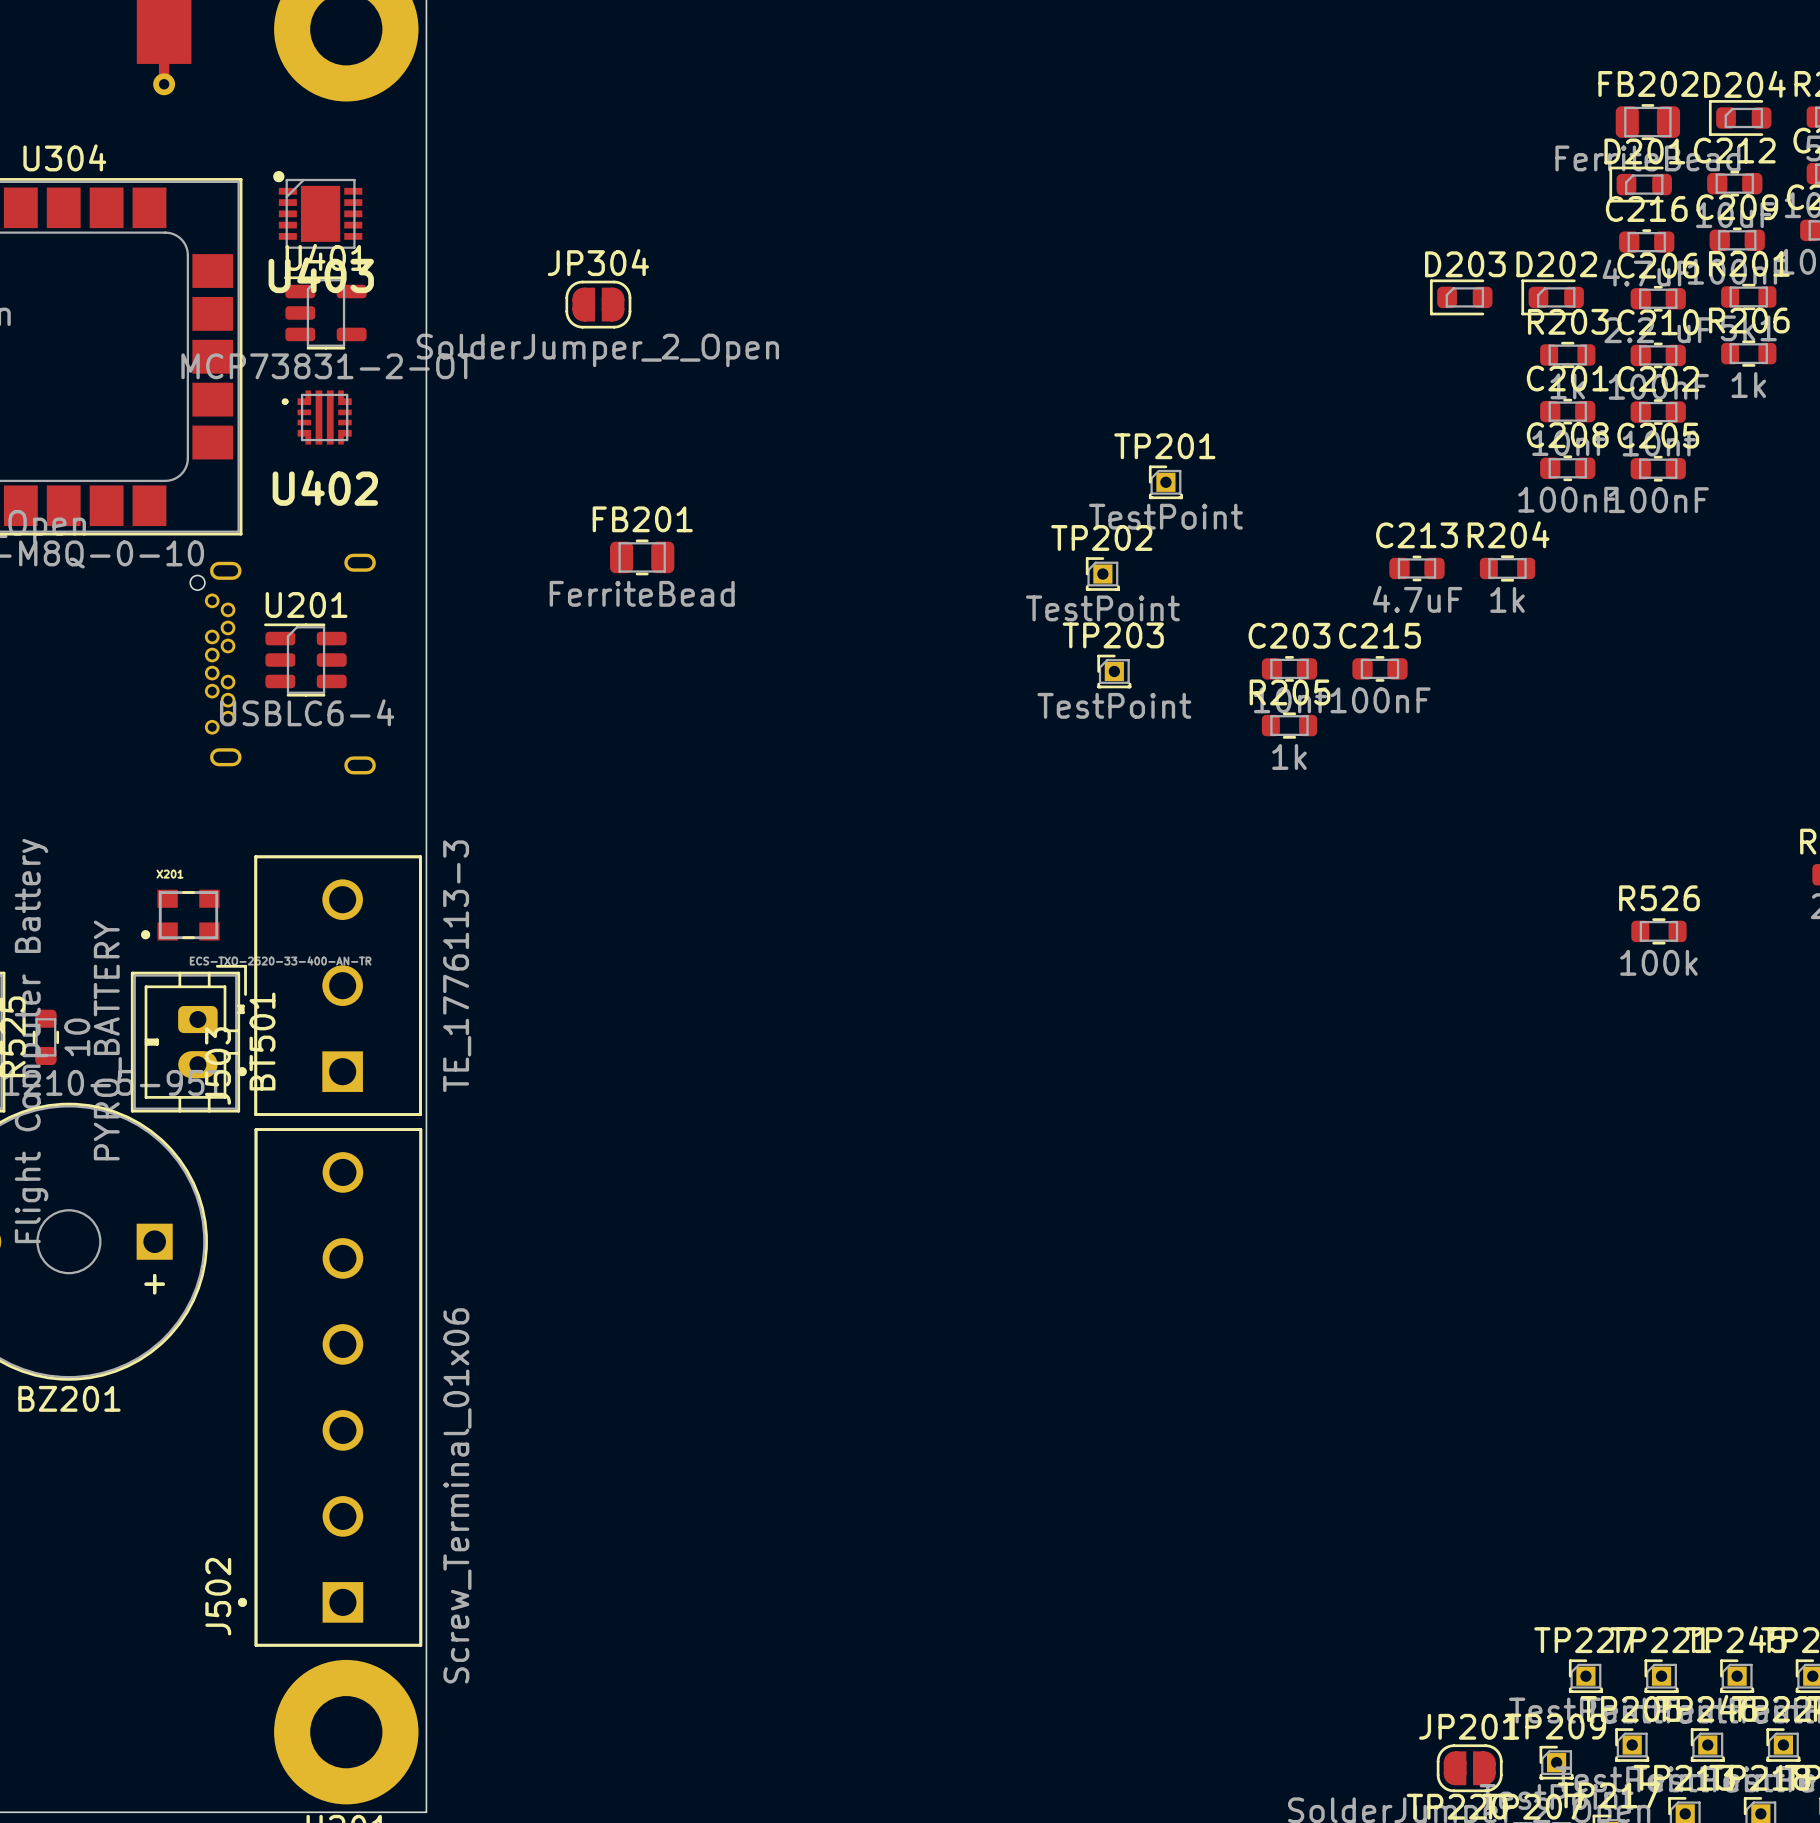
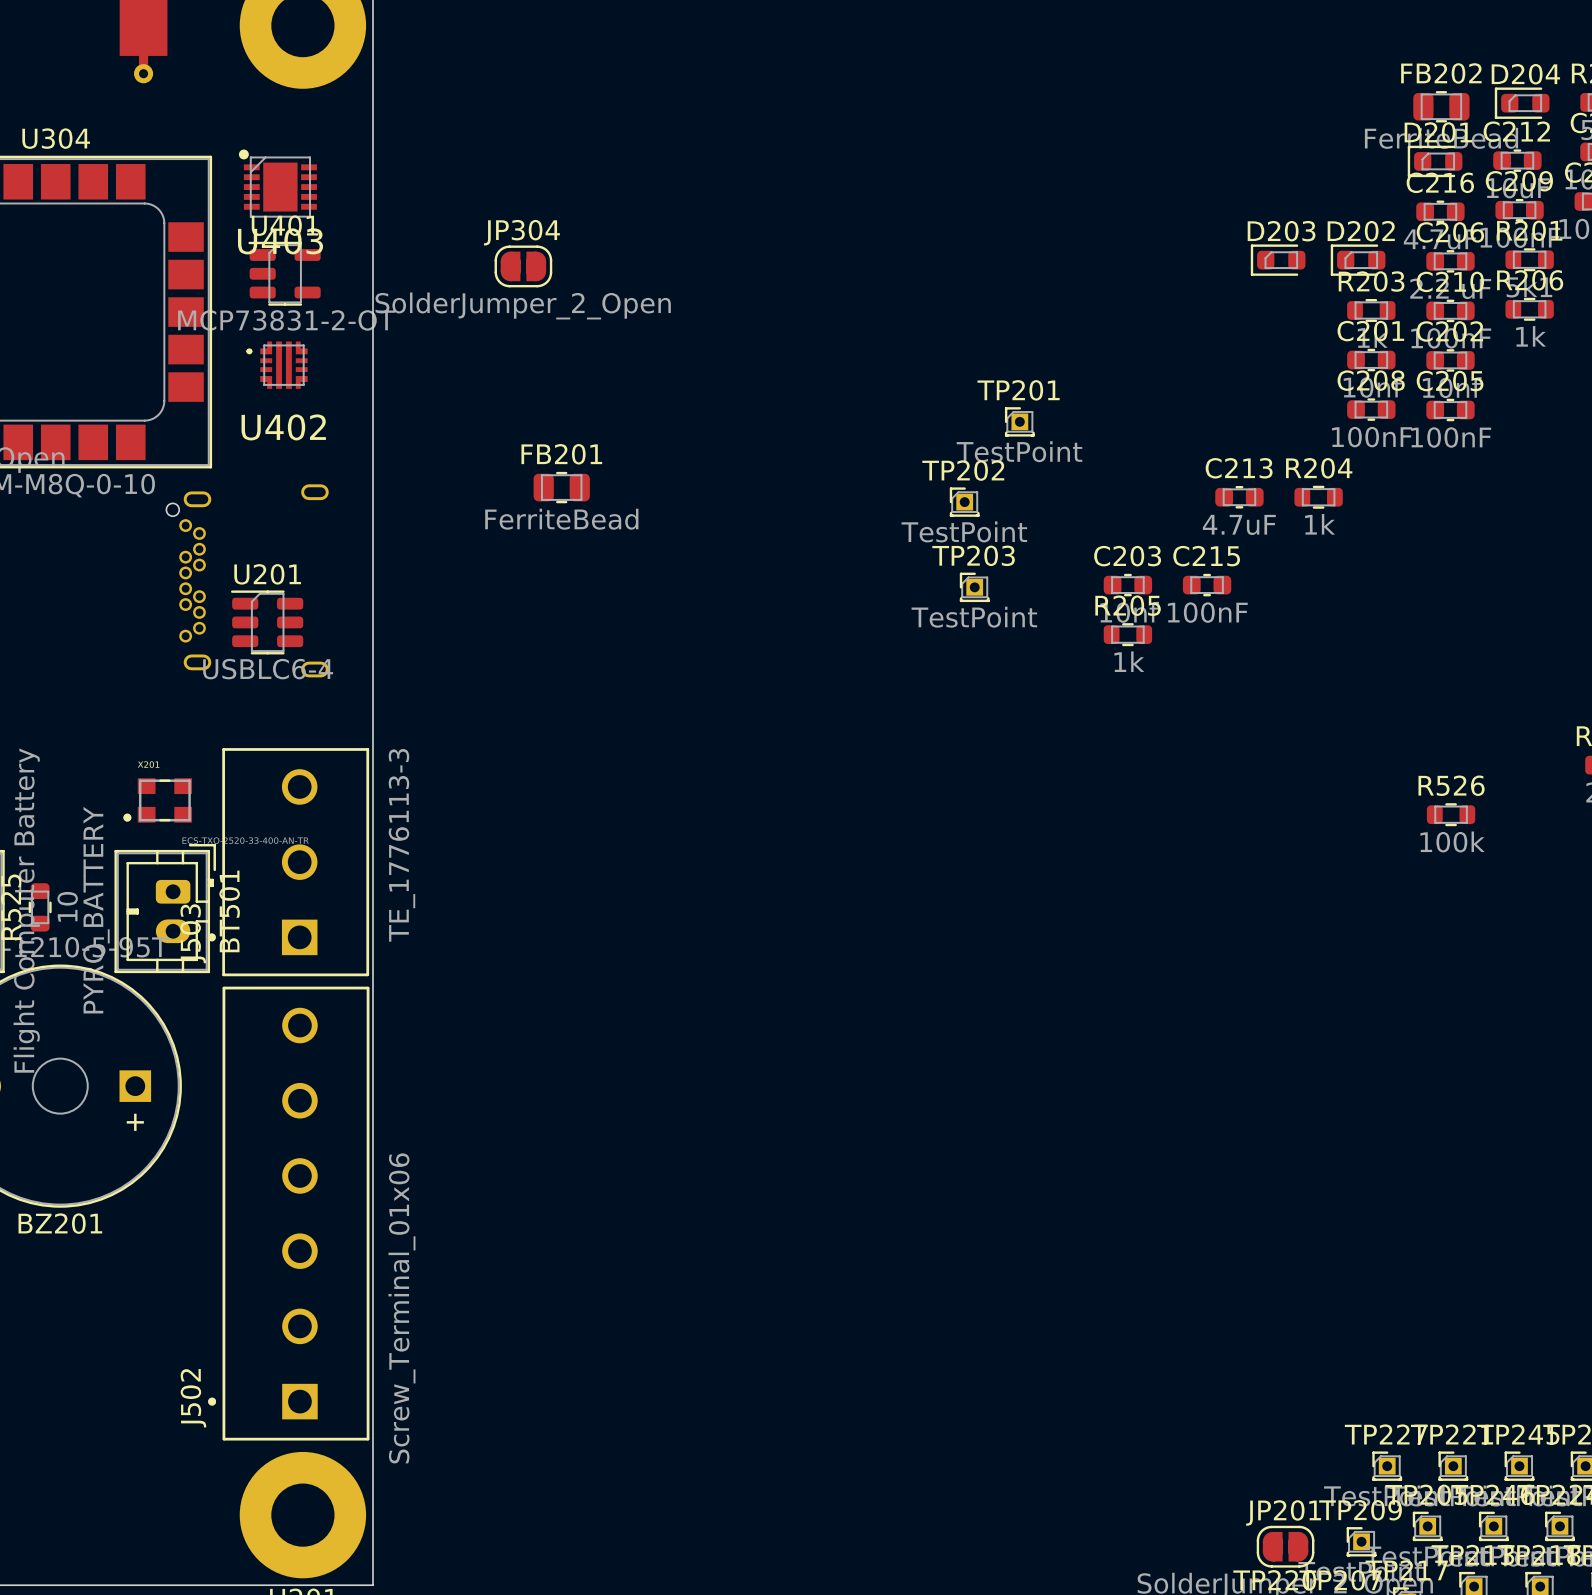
U201 position: (305, 660) -> (267, 622)

